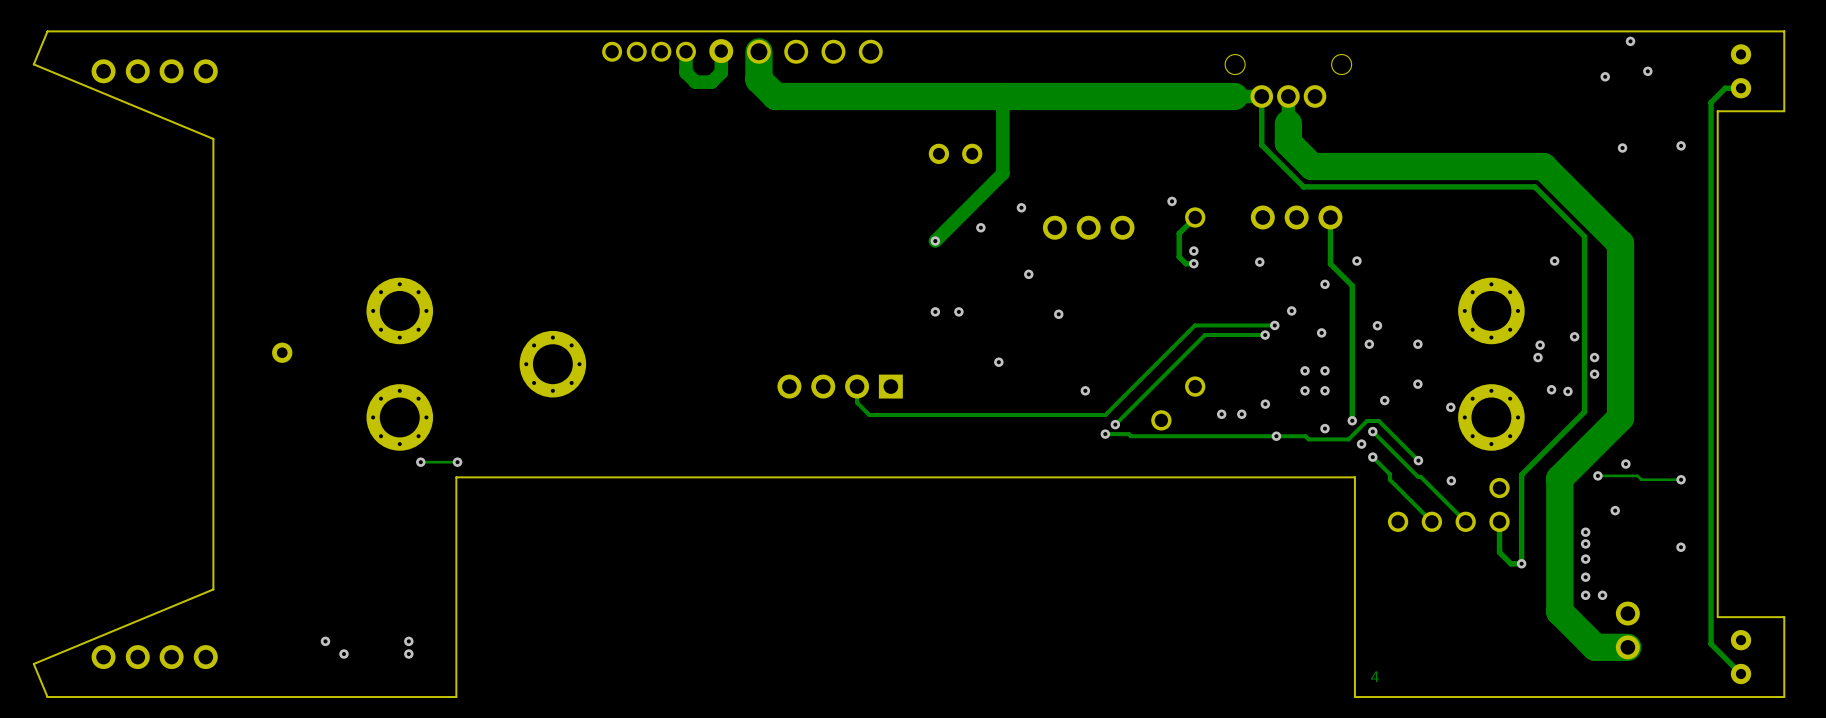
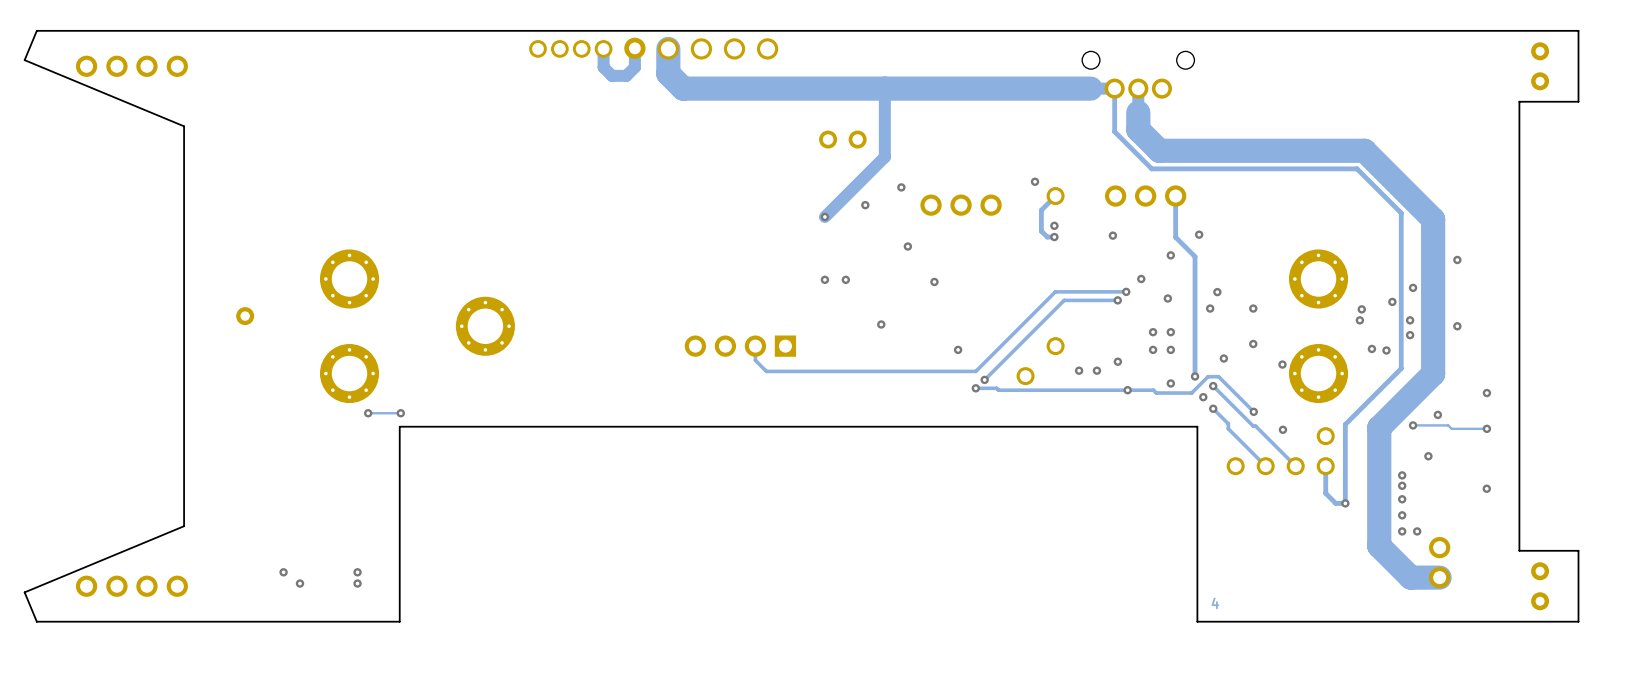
via: (1630, 41) -> none
via: (1647, 71) -> none
via: (1605, 76) -> none
track: (1741, 88) (1725, 88) (1711, 102) (1711, 644) (1741, 673) -> none
via: (1681, 145) -> none
via: (1622, 148) -> none
via: (1554, 261) -> none
via: none -> (1457, 259)
via: none -> (1413, 287)
via: none -> (1457, 326)
via: none -> (1486, 393)

